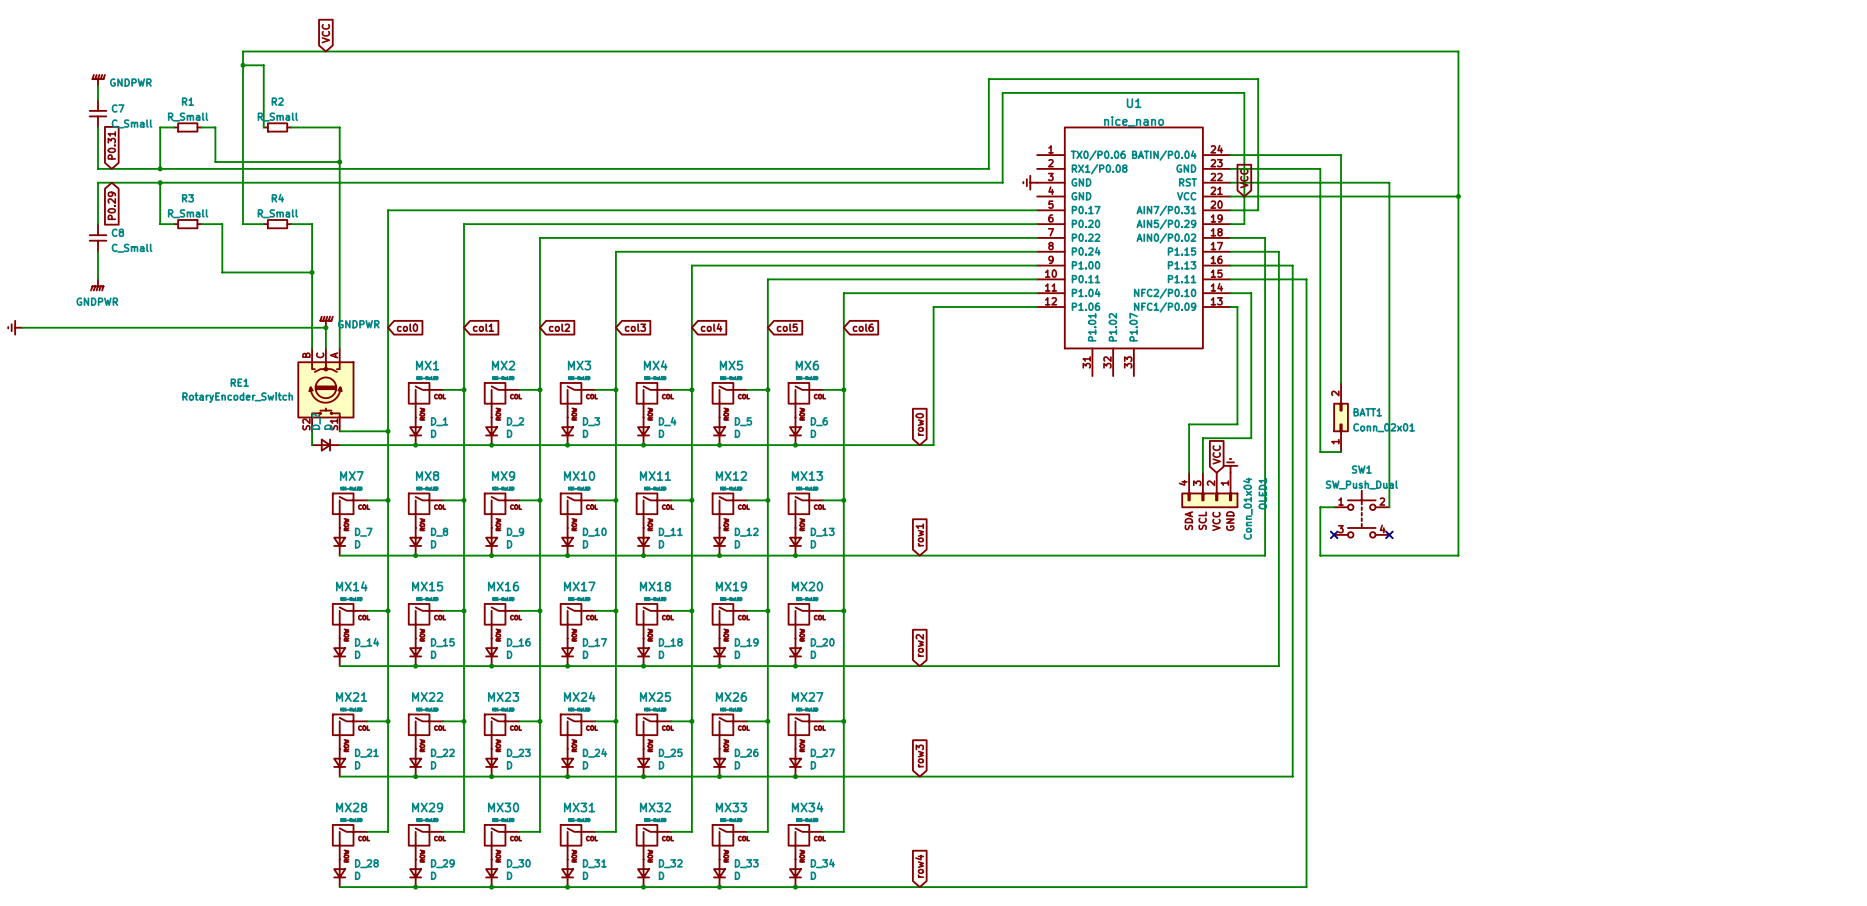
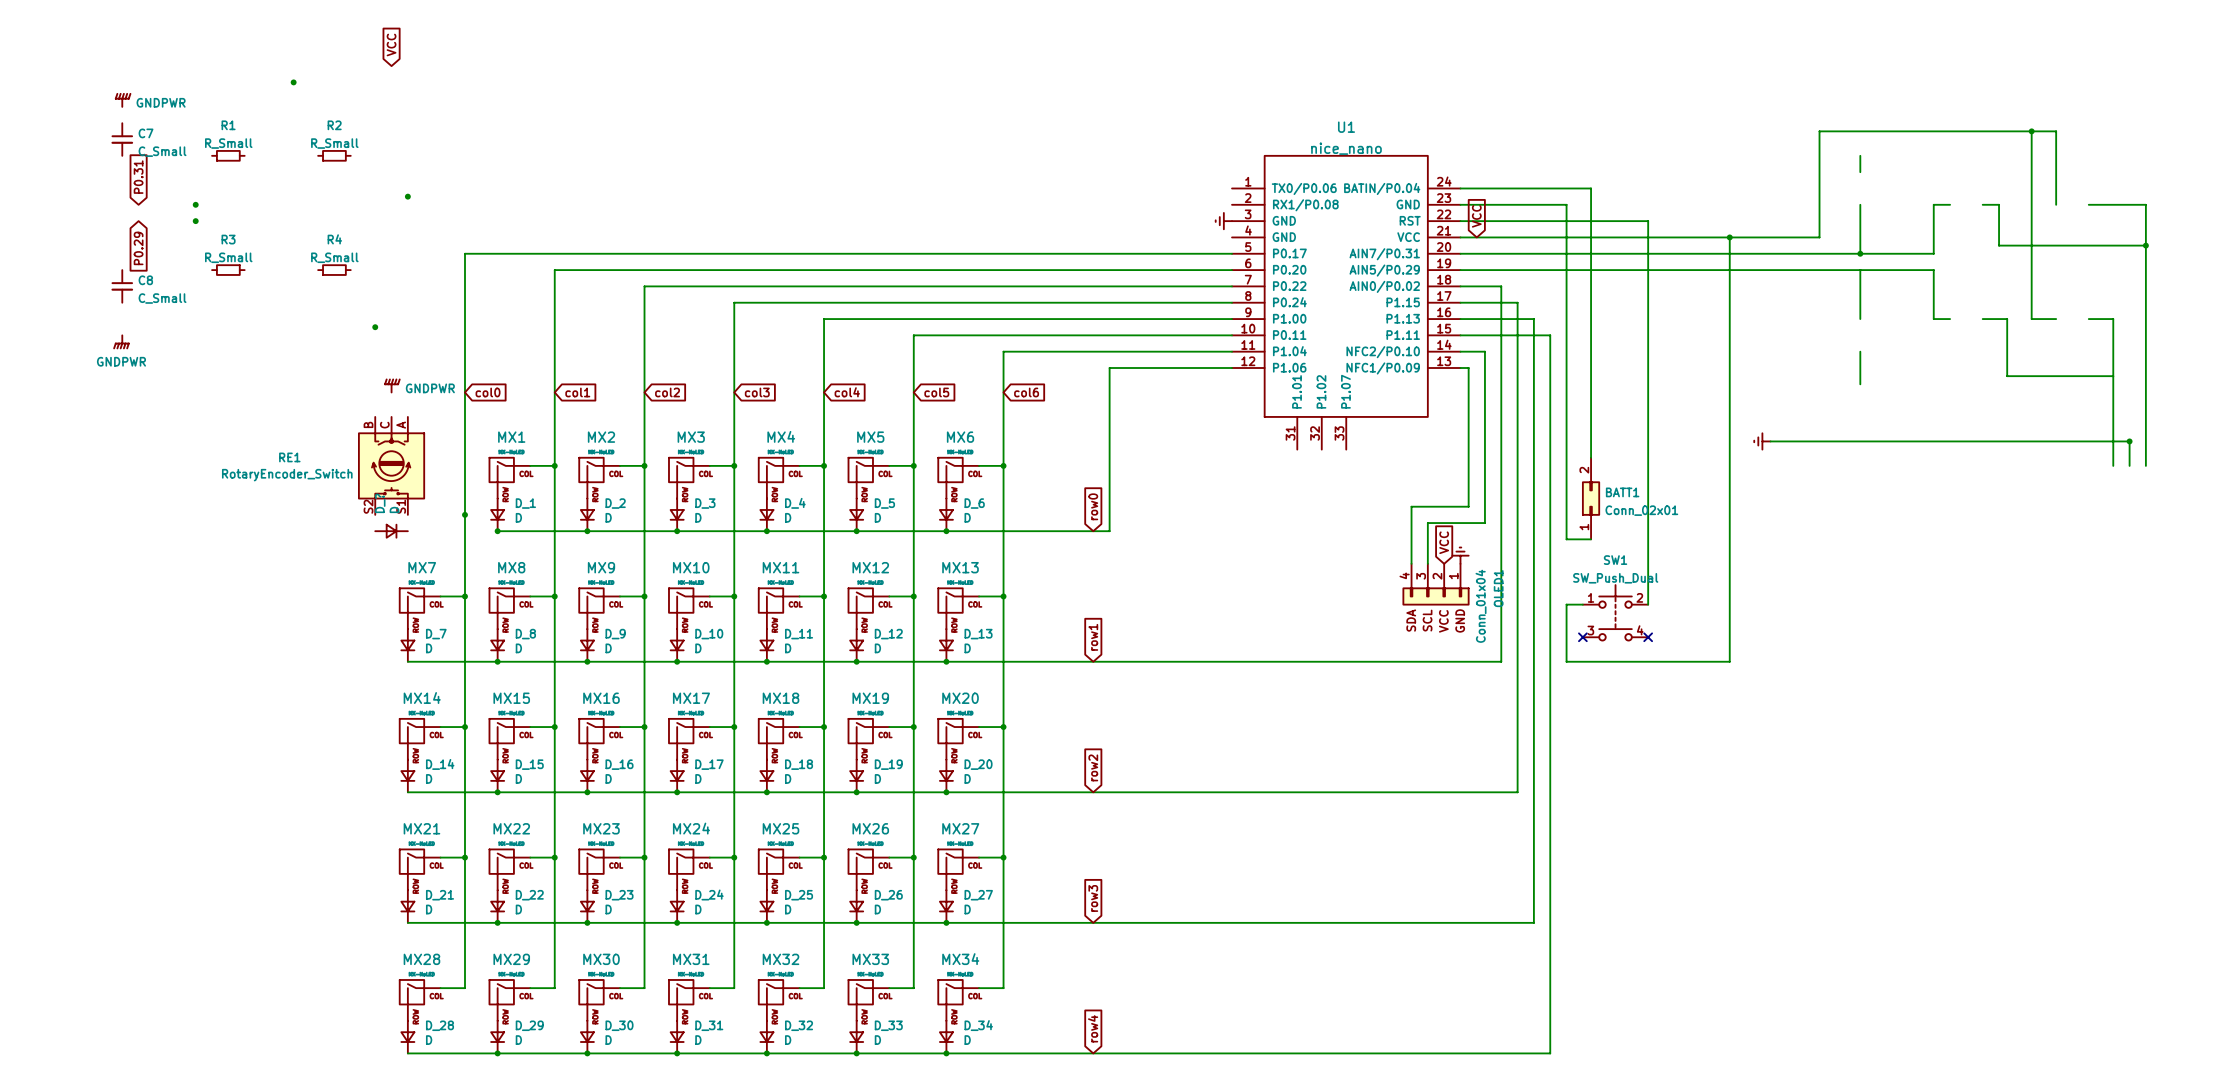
wire: (243, 65) (263, 65) (263, 127) -> none
wire: (98, 86) (98, 99) -> none
wire: none -> (2031, 131) (2031, 319) (2056, 319)
junction: none -> (2031, 131)
wire: (98, 127) (98, 168) (988, 168) (988, 79) (1258, 79) (1258, 210) -> (1950, 204) (1933, 204) (1933, 253) (1493, 253)
wire: (173, 127) (160, 127) (160, 168) -> none
wire: (201, 127) (215, 127) (215, 161) (339, 161) -> none
wire: (291, 127) (339, 127) (339, 348) -> none
wire: none -> (1860, 155) (1860, 172)
wire: none -> (1860, 204) (1860, 253)
wire: none -> (1982, 204) (1999, 204) (1999, 245) (2145, 245)
wire: none -> (2088, 204) (2145, 204) (2145, 465)
wire: (160, 182) (160, 224) (173, 224) -> none
wire: (1458, 196) (1458, 51) (243, 51) (243, 224) (263, 224) -> (1729, 237) (1819, 237) (1819, 131) (2056, 131) (2056, 204)
junction: none -> (2145, 245)
junction: none -> (1860, 253)
wire: (98, 224) (98, 182) (1002, 182) (1002, 92) (1244, 92) (1244, 224) -> (1950, 319) (1933, 319) (1933, 270) (1476, 270)
wire: (201, 224) (222, 224) (222, 272) (312, 272) -> none
wire: (291, 224) (312, 224) (312, 348) -> none
wire: none -> (1860, 270) (1860, 319)
wire: (98, 251) (98, 279) -> none
wire: none -> (1982, 319) (2007, 319) (2007, 376) (2113, 376)
wire: none -> (2088, 319) (2113, 319) (2113, 465)
wire: none -> (1860, 351) (1860, 384)
power symbol: (15, 327) -> none
wire: (22, 327) (325, 327) (325, 348) -> none
junction: (325, 327) -> none
power symbol: none -> (1762, 441)
wire: none -> (1770, 441) (2129, 441) (2129, 465)
junction: none -> (2129, 441)
wire: (312, 431) (312, 445) -> none
wire: (339, 431) (388, 431) -> none
wire: (339, 445) (415, 445) -> none

